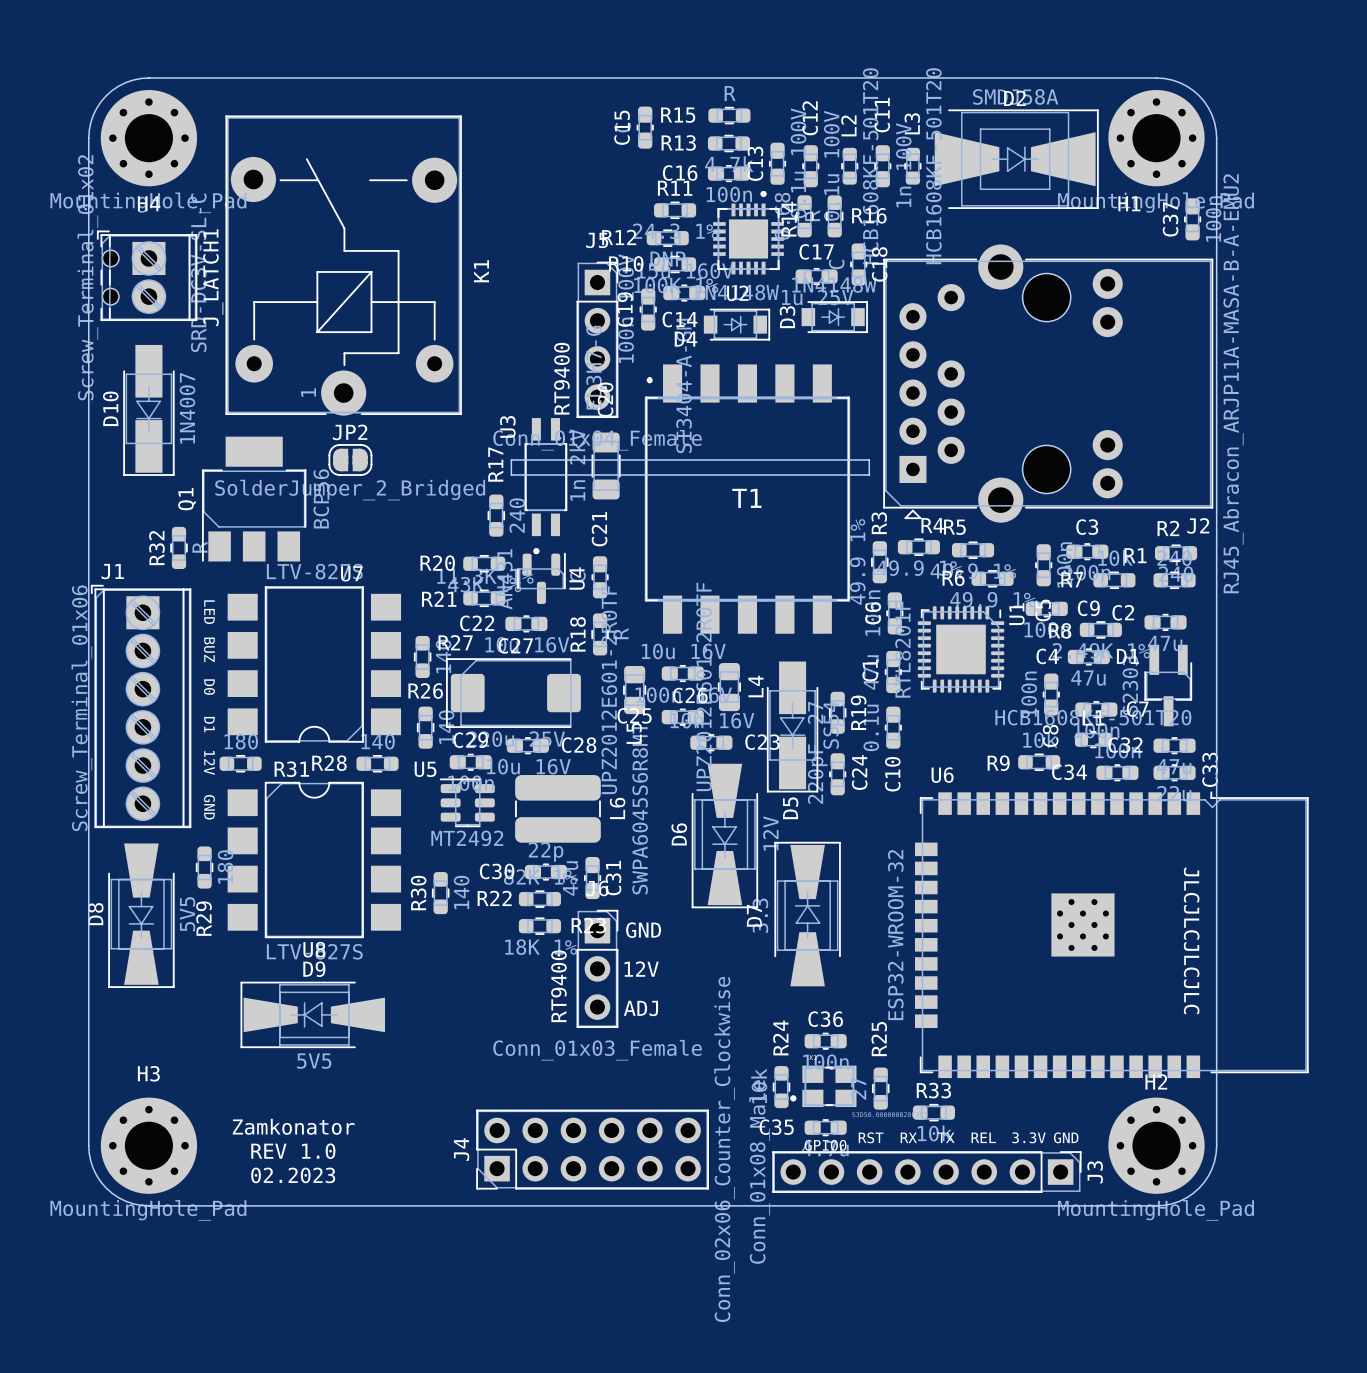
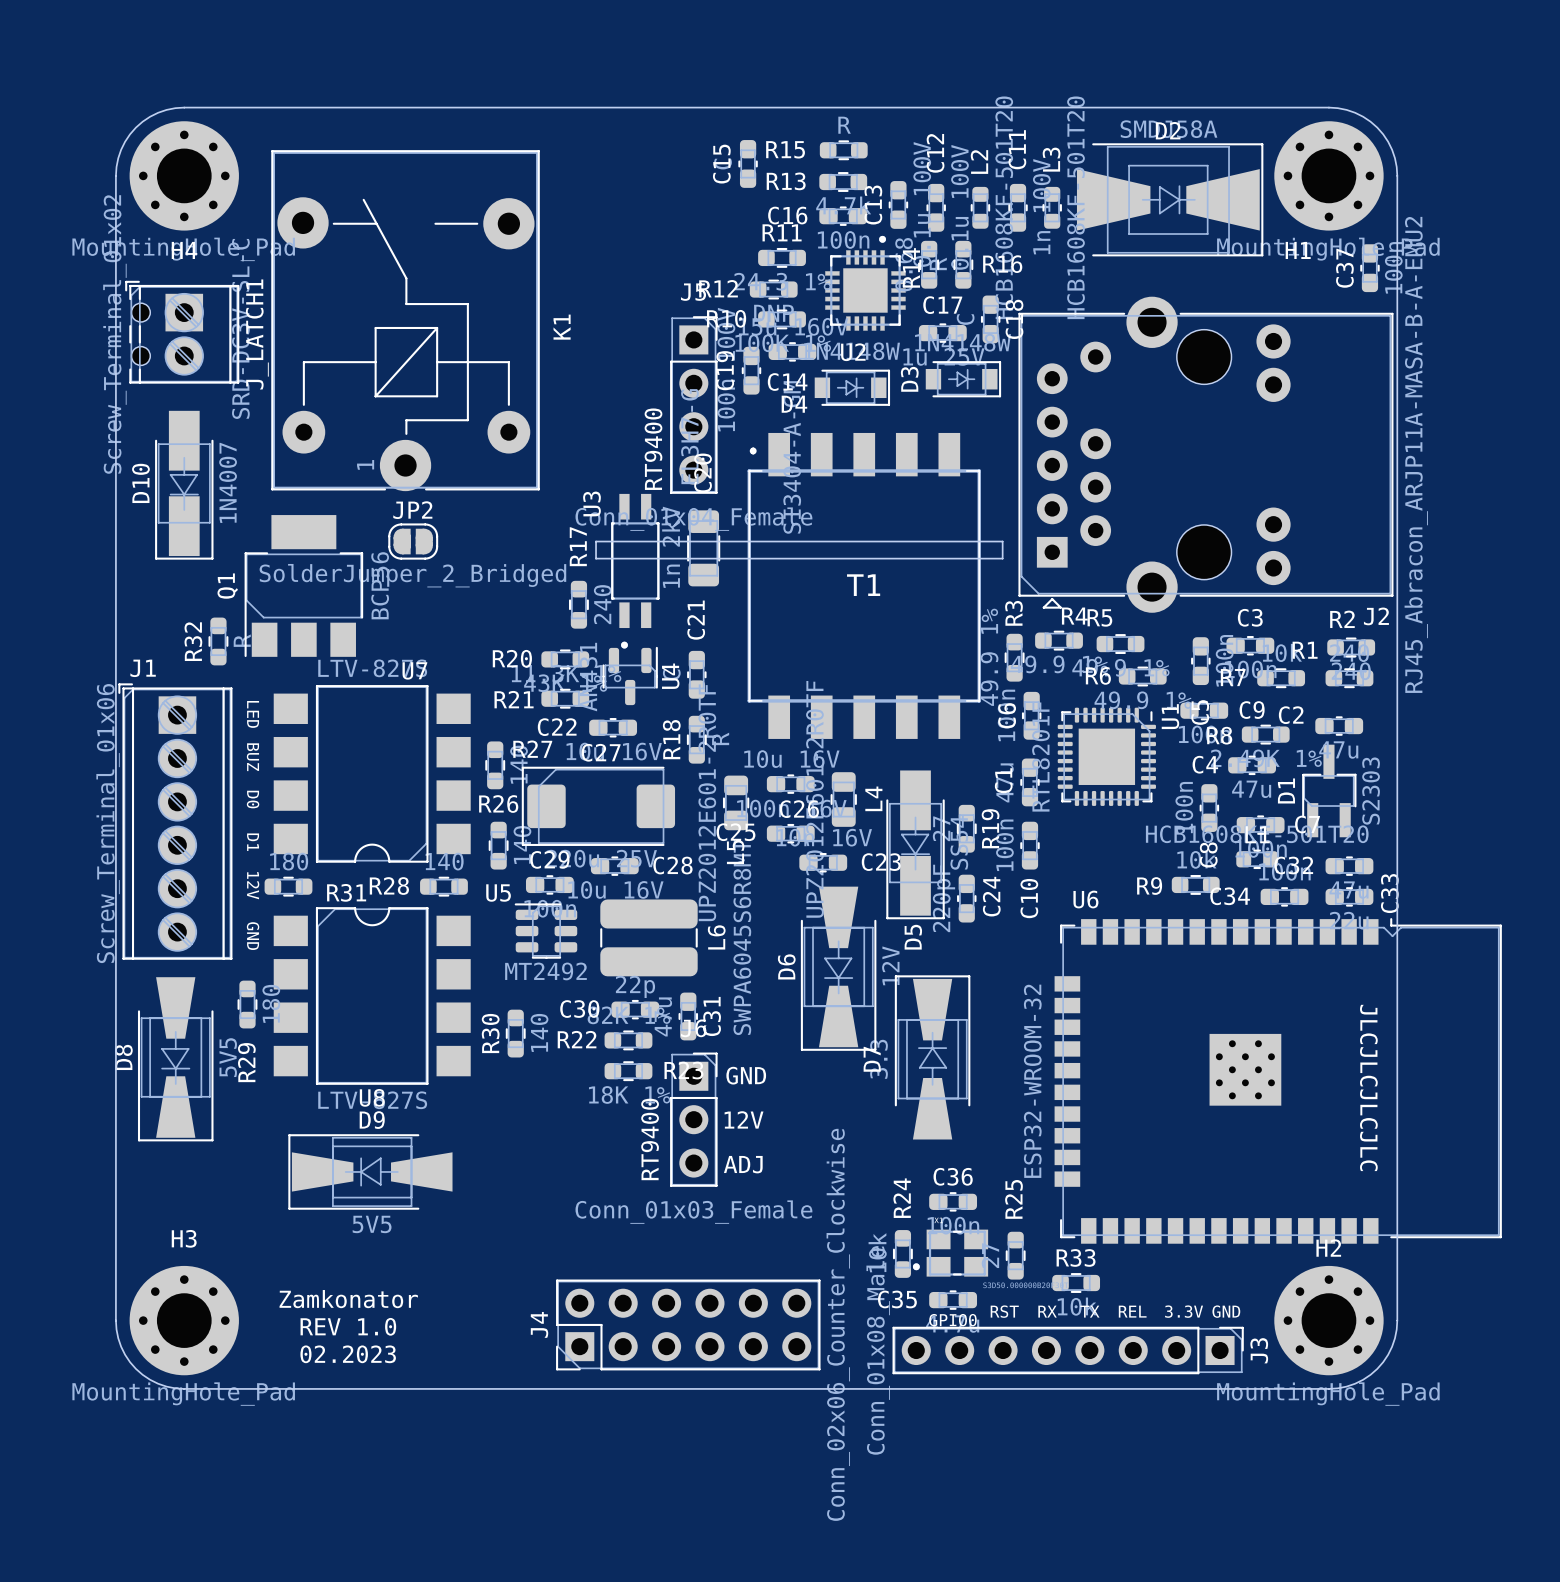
D1 rotation: 0° (1168, 685) -> 180° (1329, 790)
C10 value: 0.1u (871, 727) -> 100n (1004, 845)

